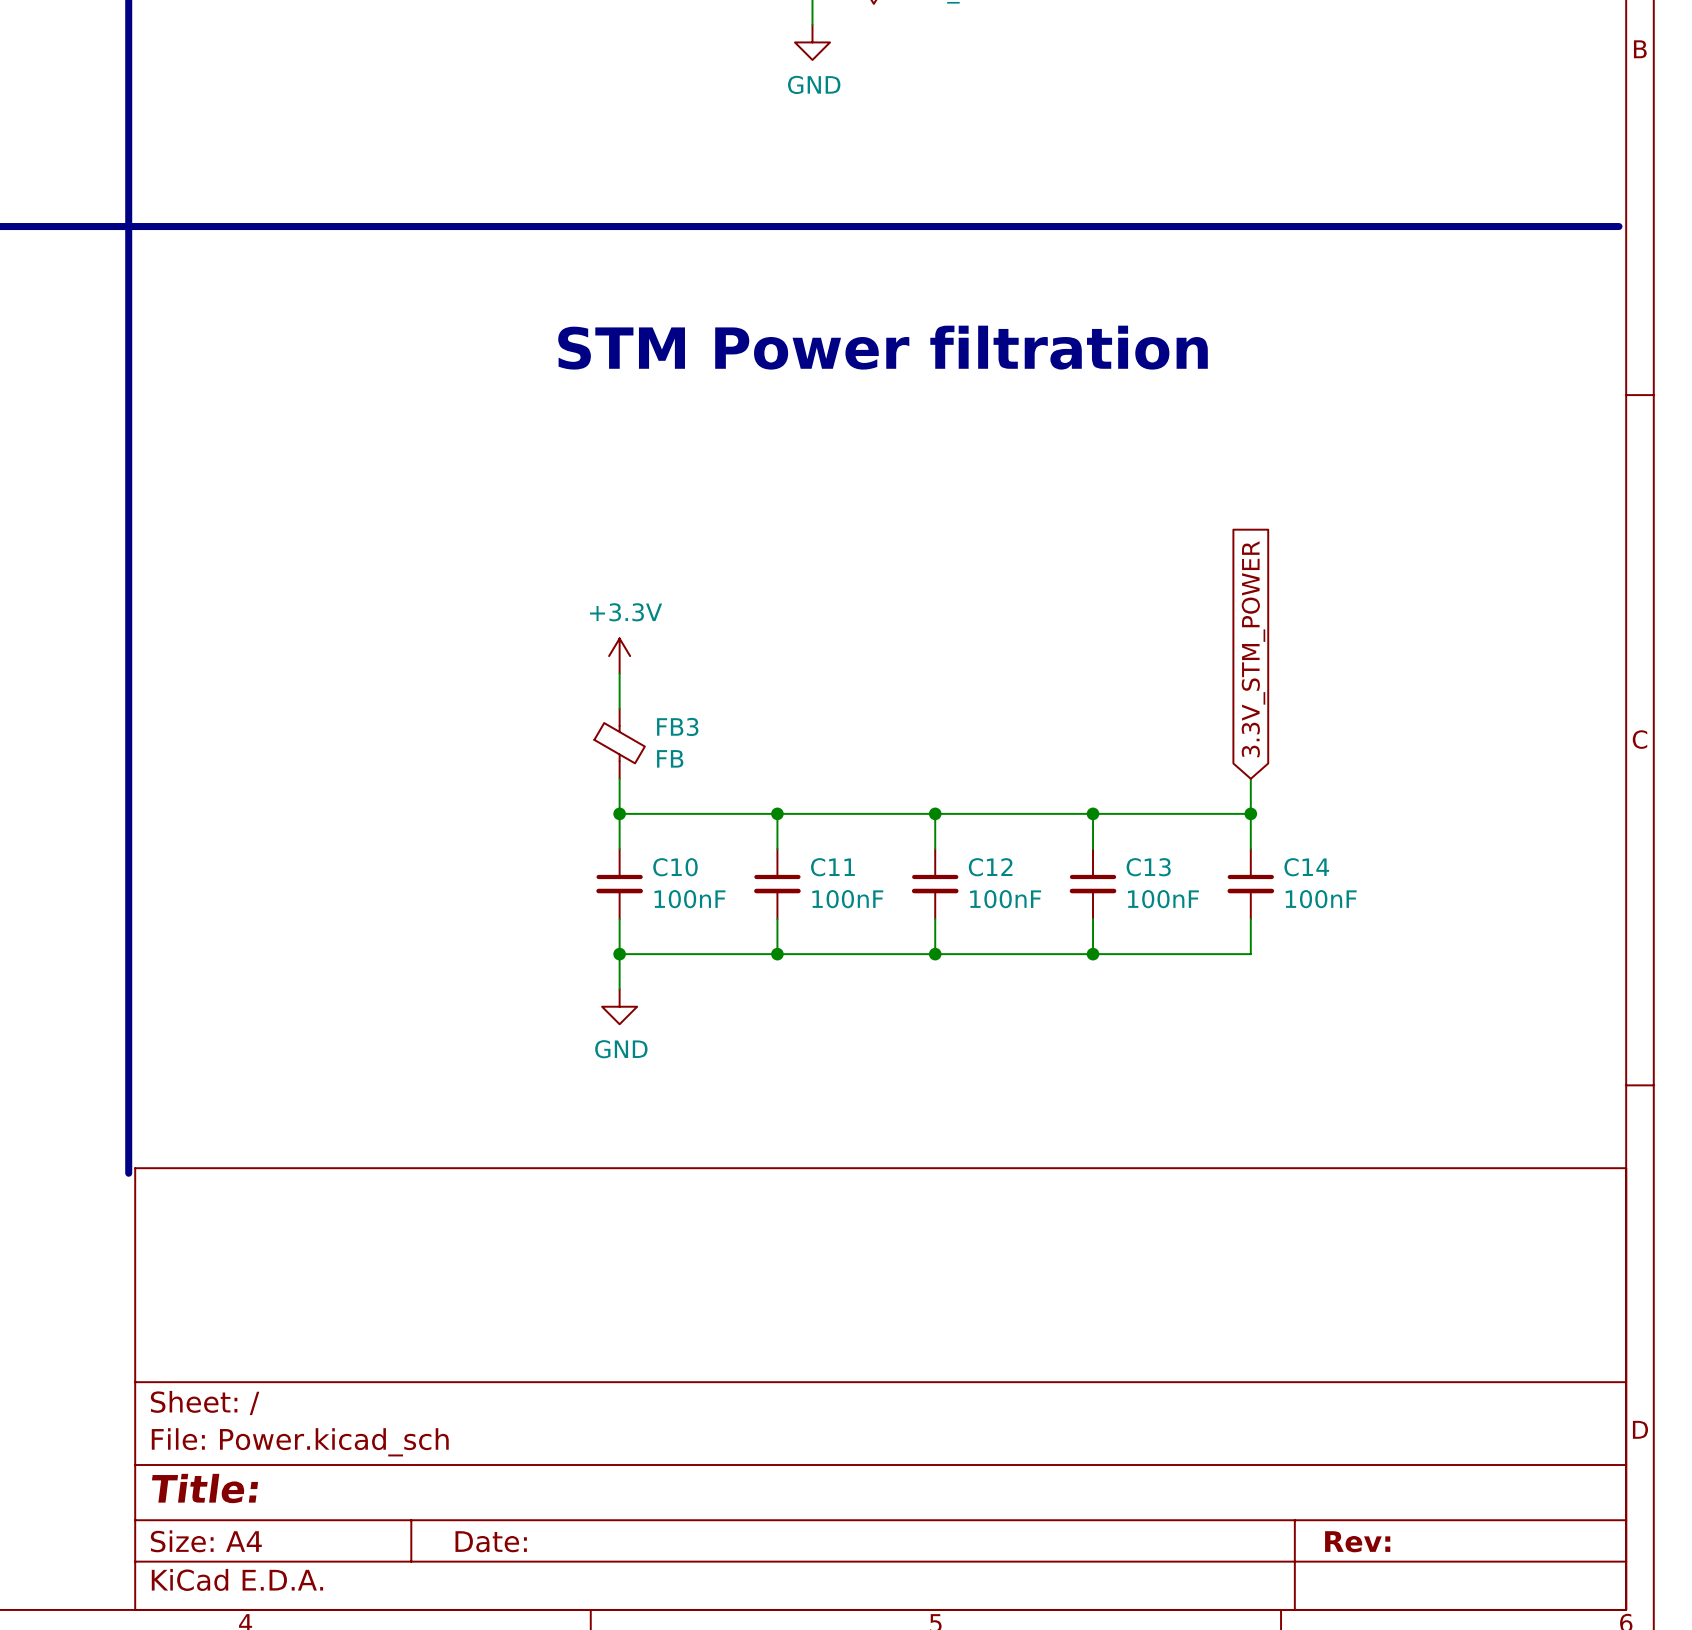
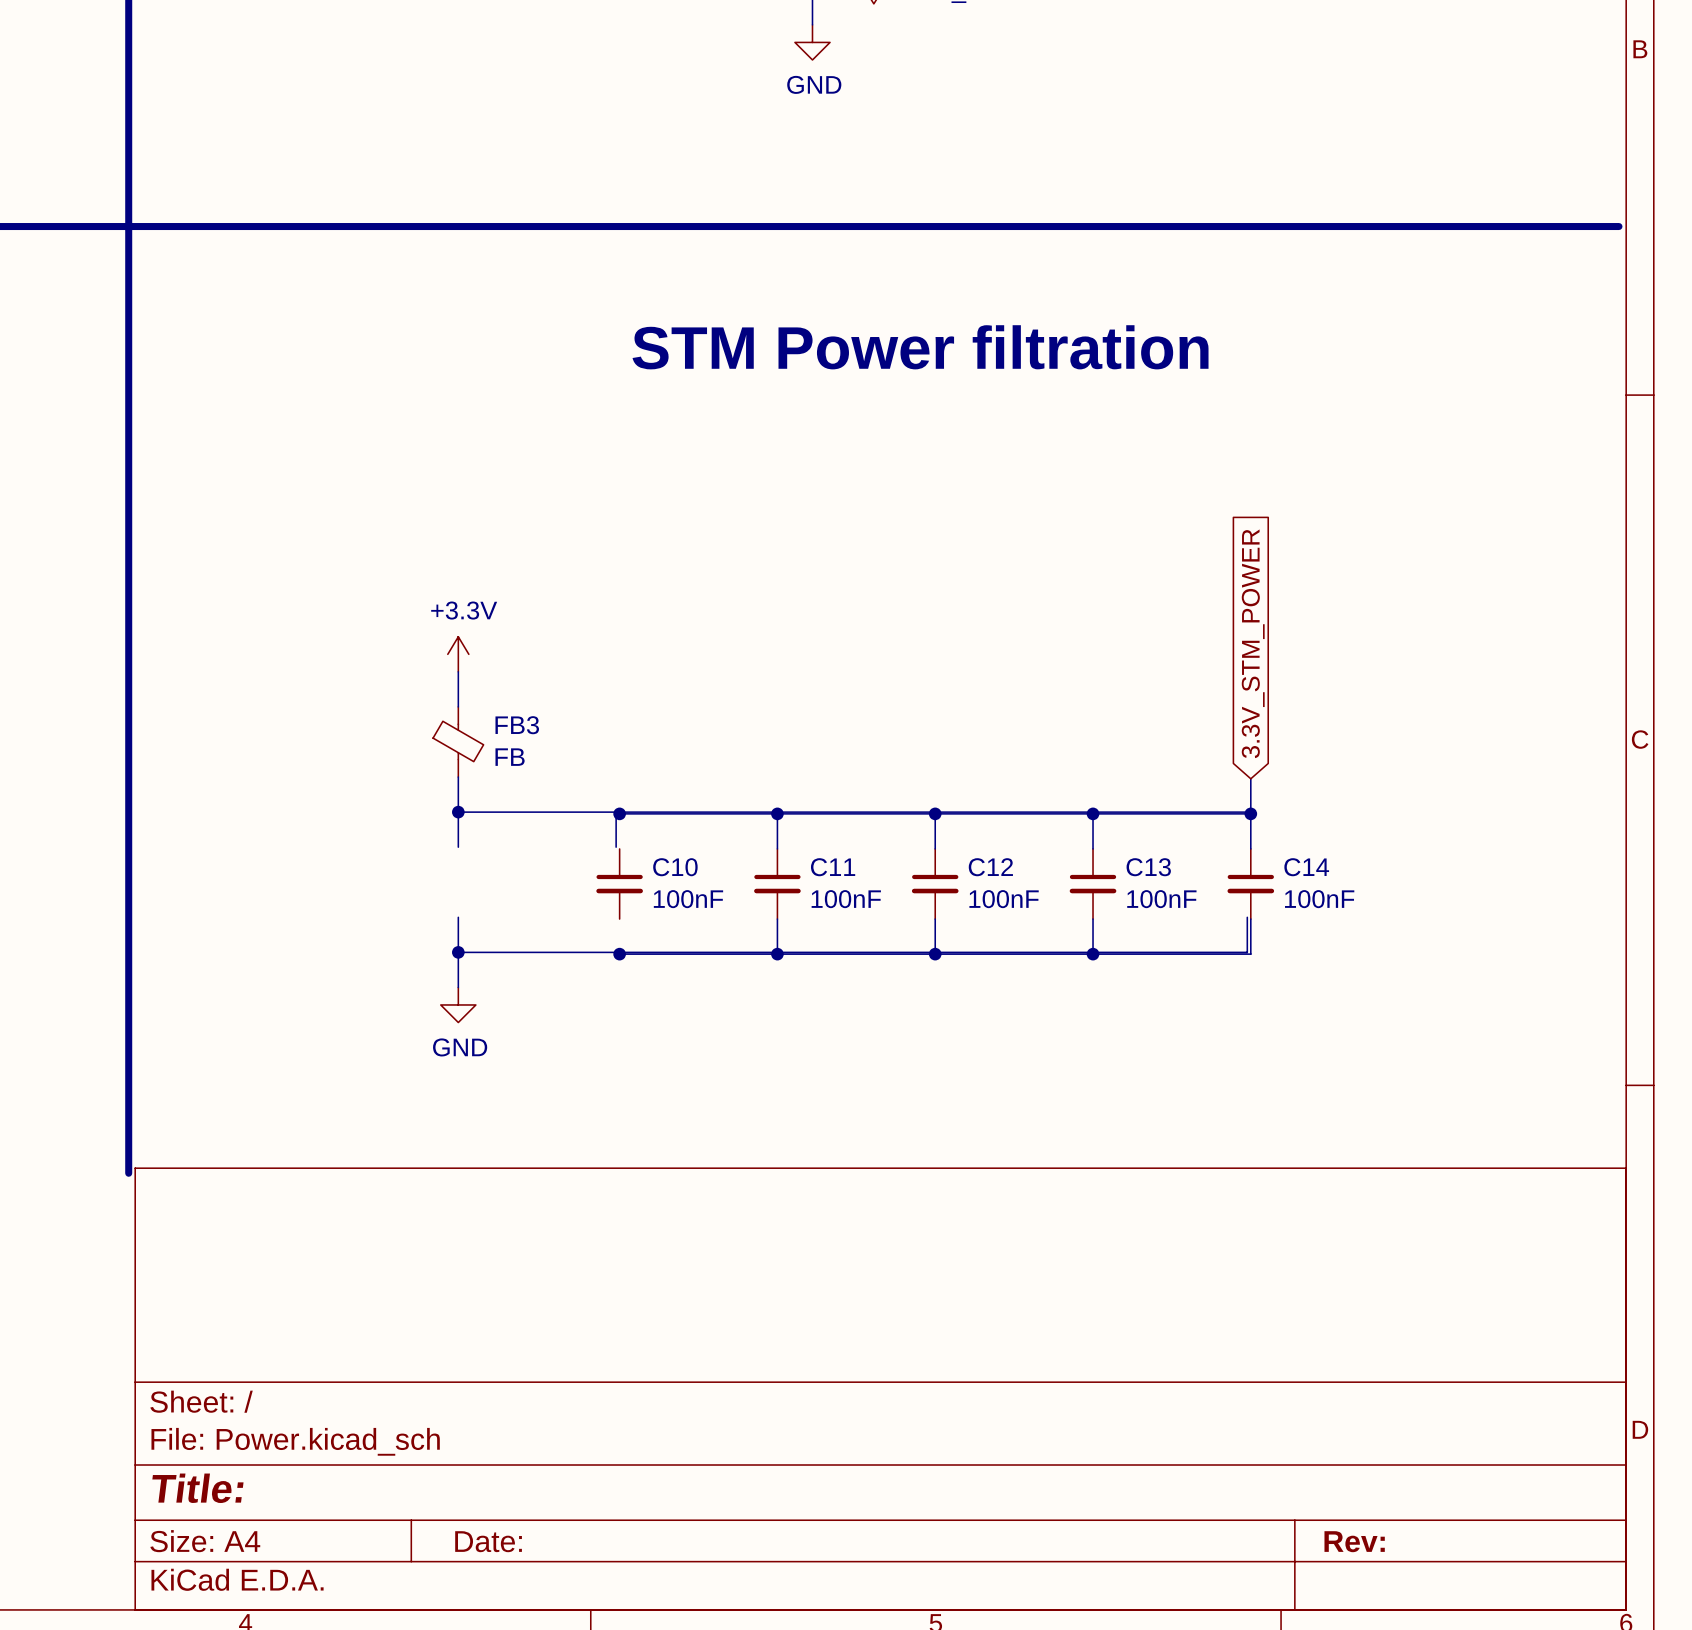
power symbol position: +3.3V (619, 656) -> +3.3V (458, 654)
wire: none -> (458, 671) (458, 706)
wire: (619, 673) (619, 708) -> (616, 812) (616, 847)
FB3 position: (619, 743) -> (458, 741)
wire: (619, 778) (619, 848) -> (458, 777) (458, 847)
wire: none -> (458, 812) (1247, 812)
junction: none -> (458, 812)
wire: none -> (1247, 917) (1247, 952) (458, 952)
wire: (619, 919) (619, 989) -> (458, 917) (458, 987)
junction: none -> (458, 952)
power symbol position: GND (619, 1006) -> GND (458, 1004)

